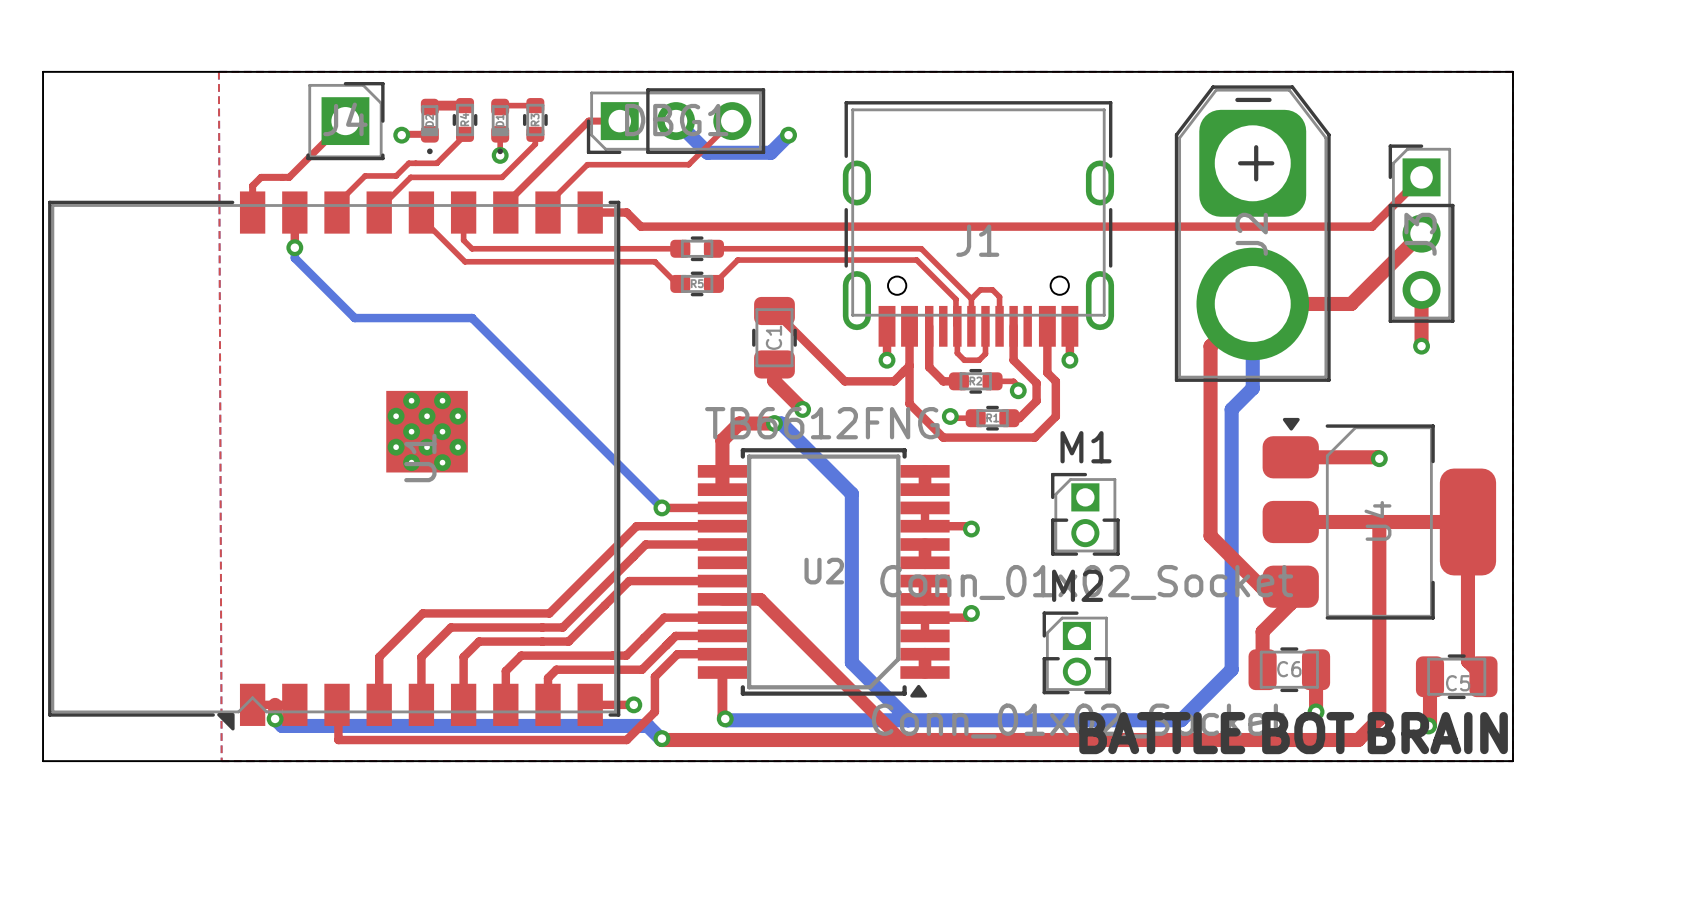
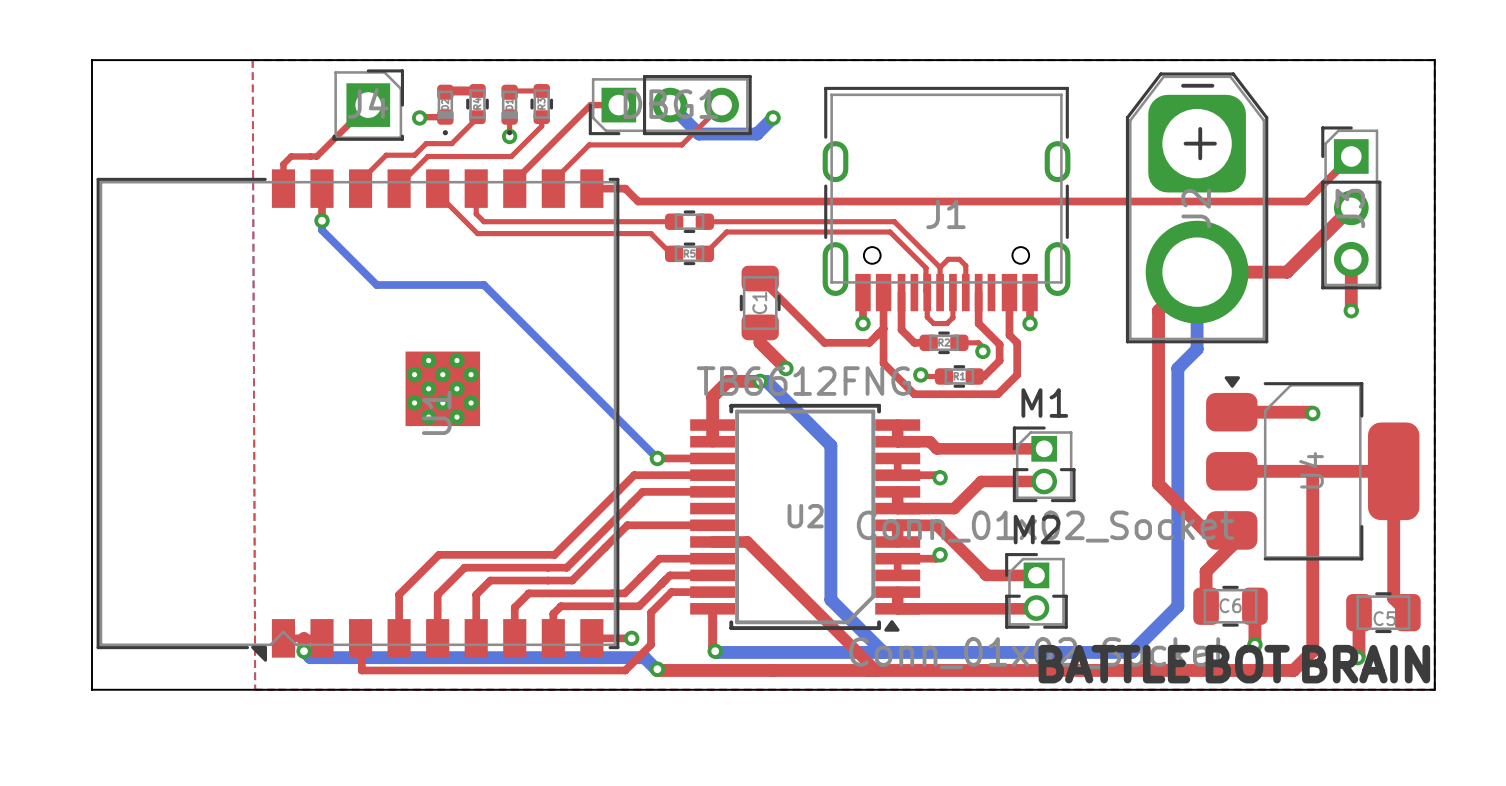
top track: none -> (897, 441) (929, 441) (936, 448) (1044, 448)
top track: none -> (1044, 481) (981, 481) (954, 508) (897, 508)
top track: none -> (897, 525) (936, 525) (986, 575) (1036, 575)
top track: none -> (1036, 608) (897, 608)

